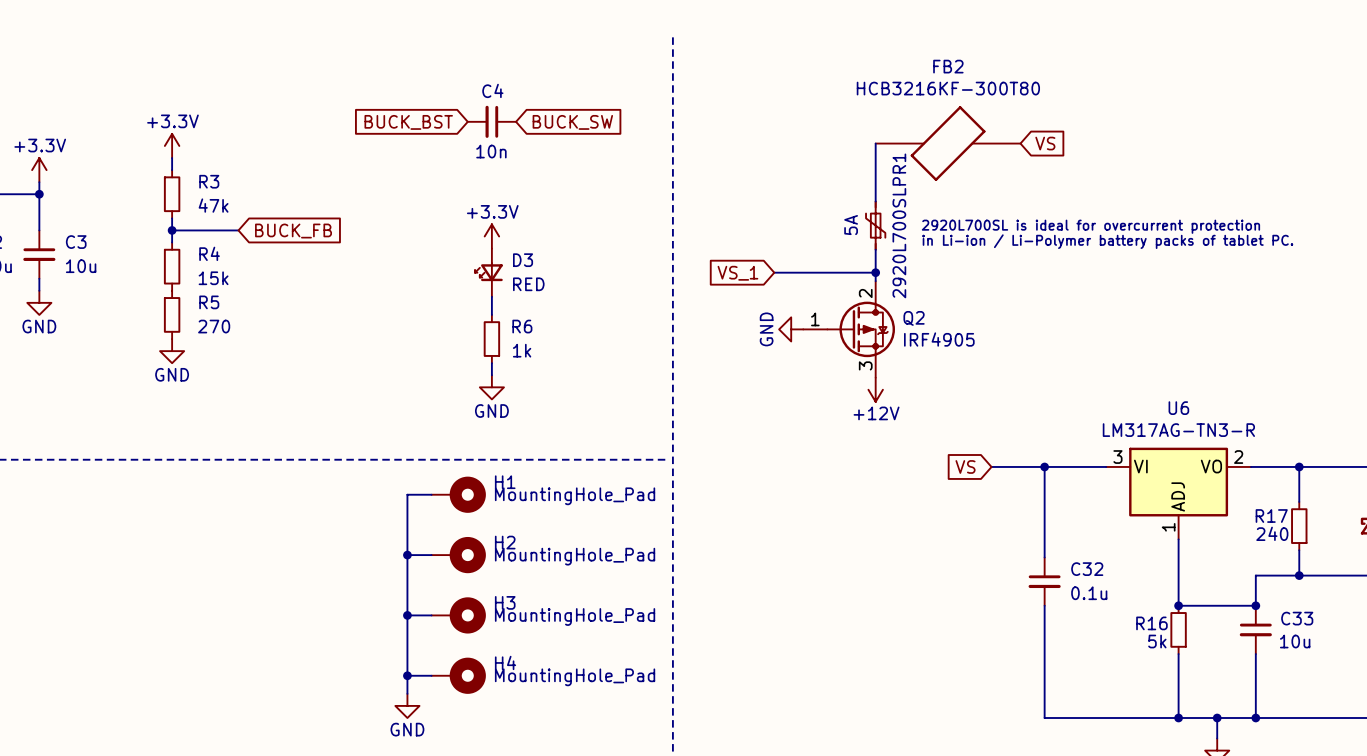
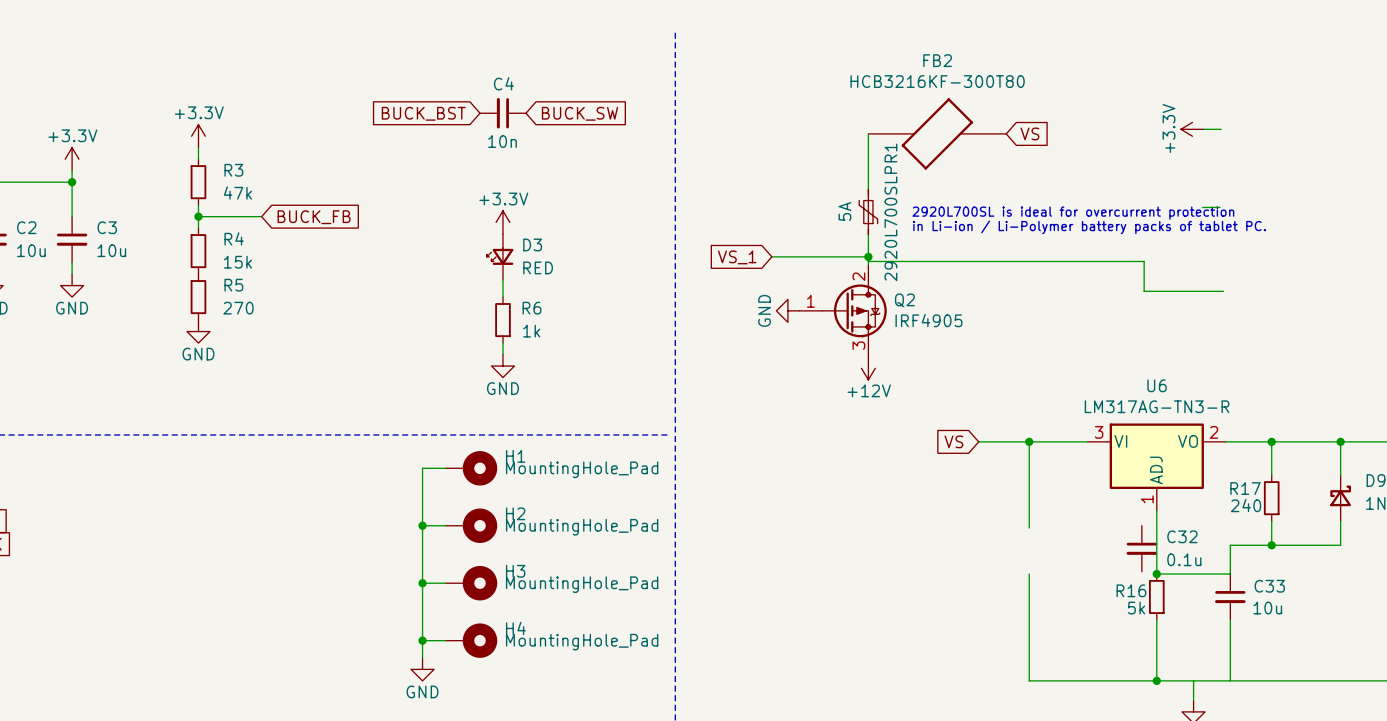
power symbol: none -> +3.3V (1192, 129)
wire: none -> (1203, 129) (1221, 129)
wire: none -> (1202, 207) (1219, 207)
wire: none -> (868, 261) (1144, 261) (1144, 291) (1223, 291)
C32 position: (1044, 581) -> (1141, 548)
junction: (1255, 605) -> none
junction: (1217, 718) -> none
junction: (1255, 718) -> none

